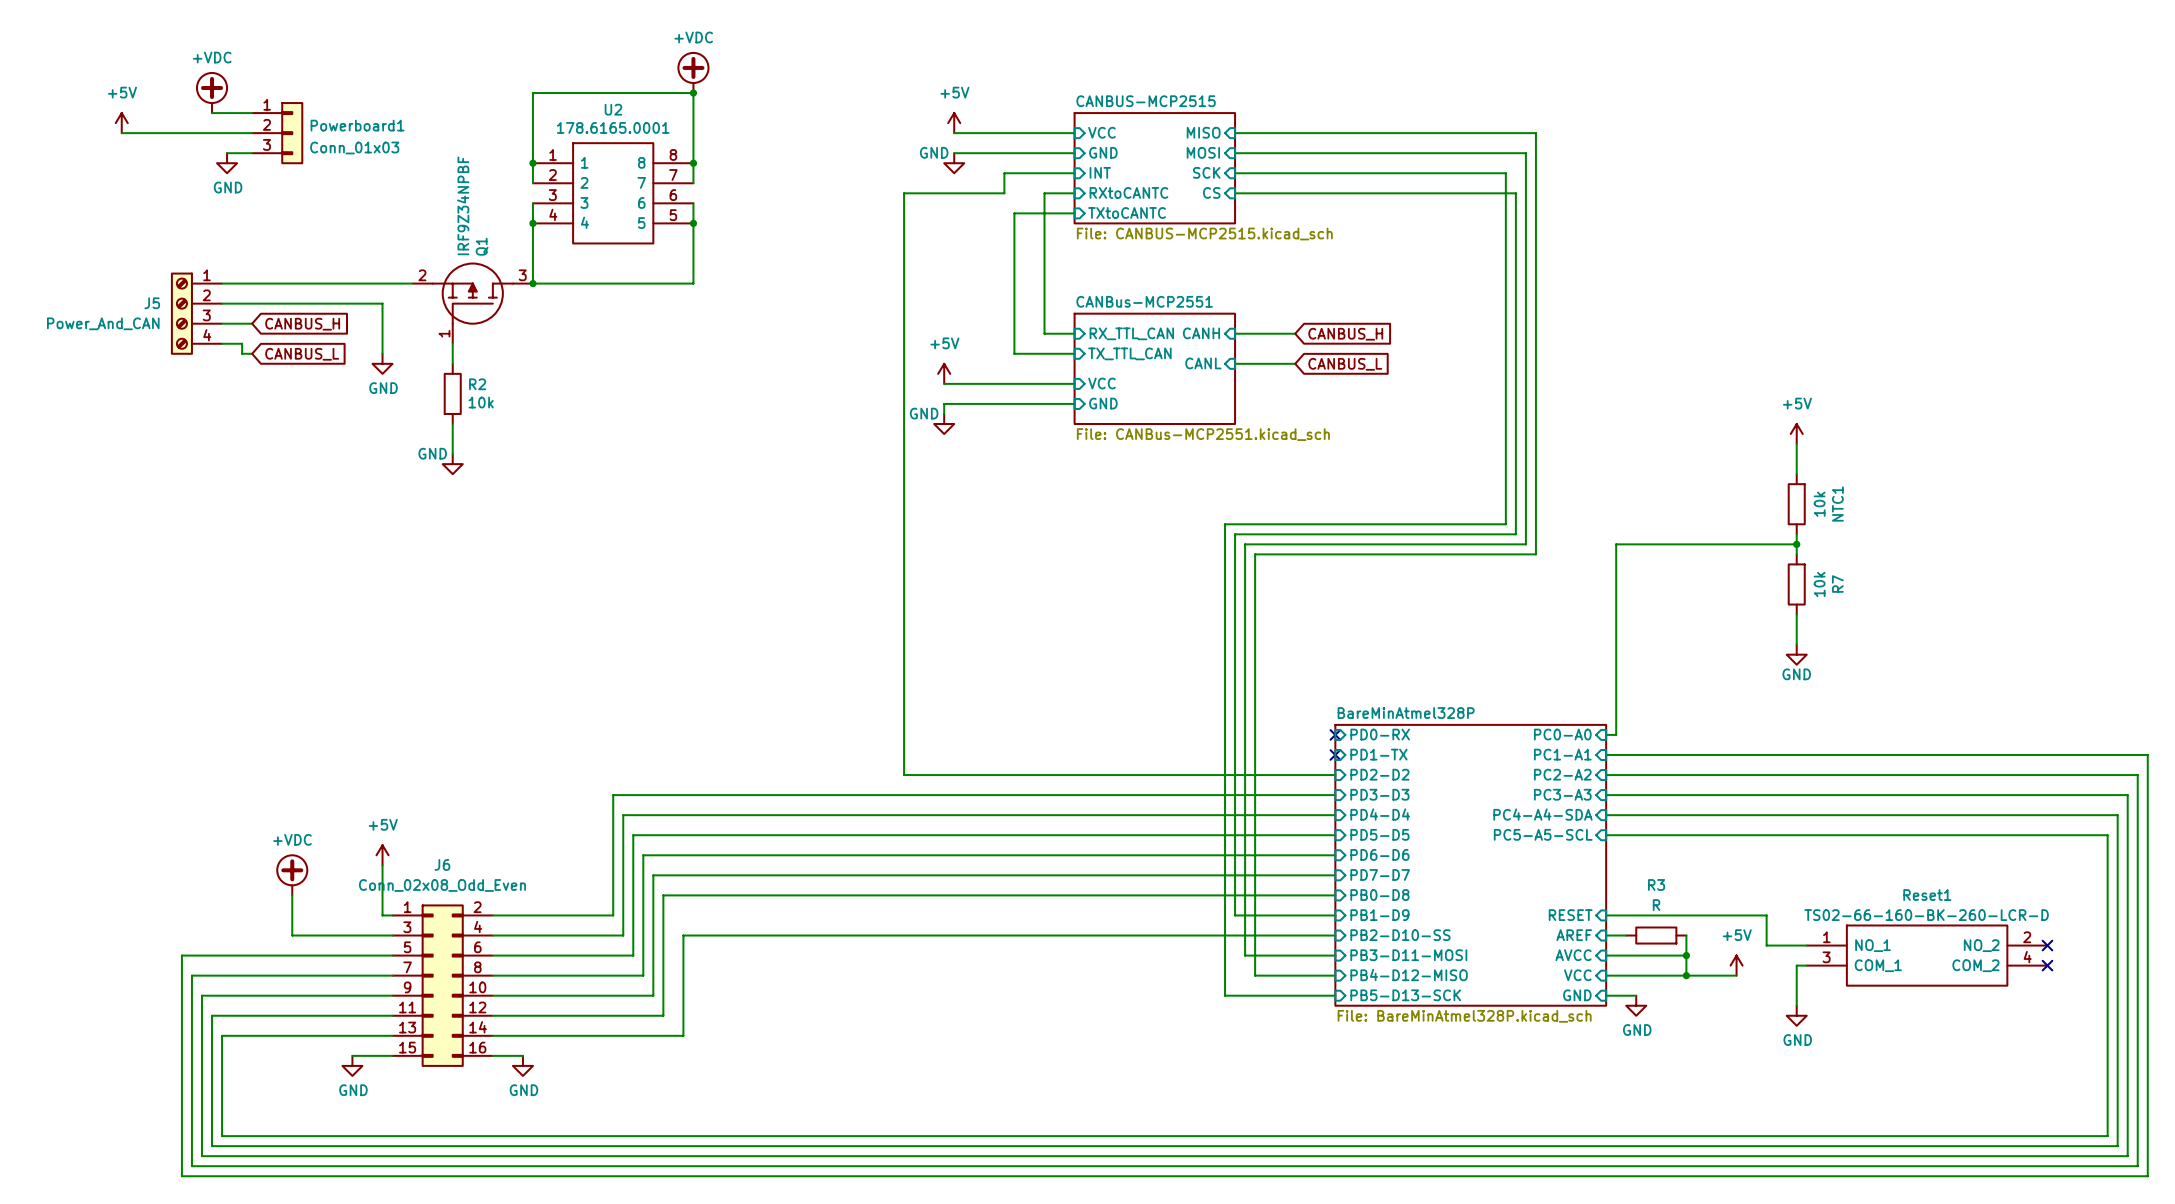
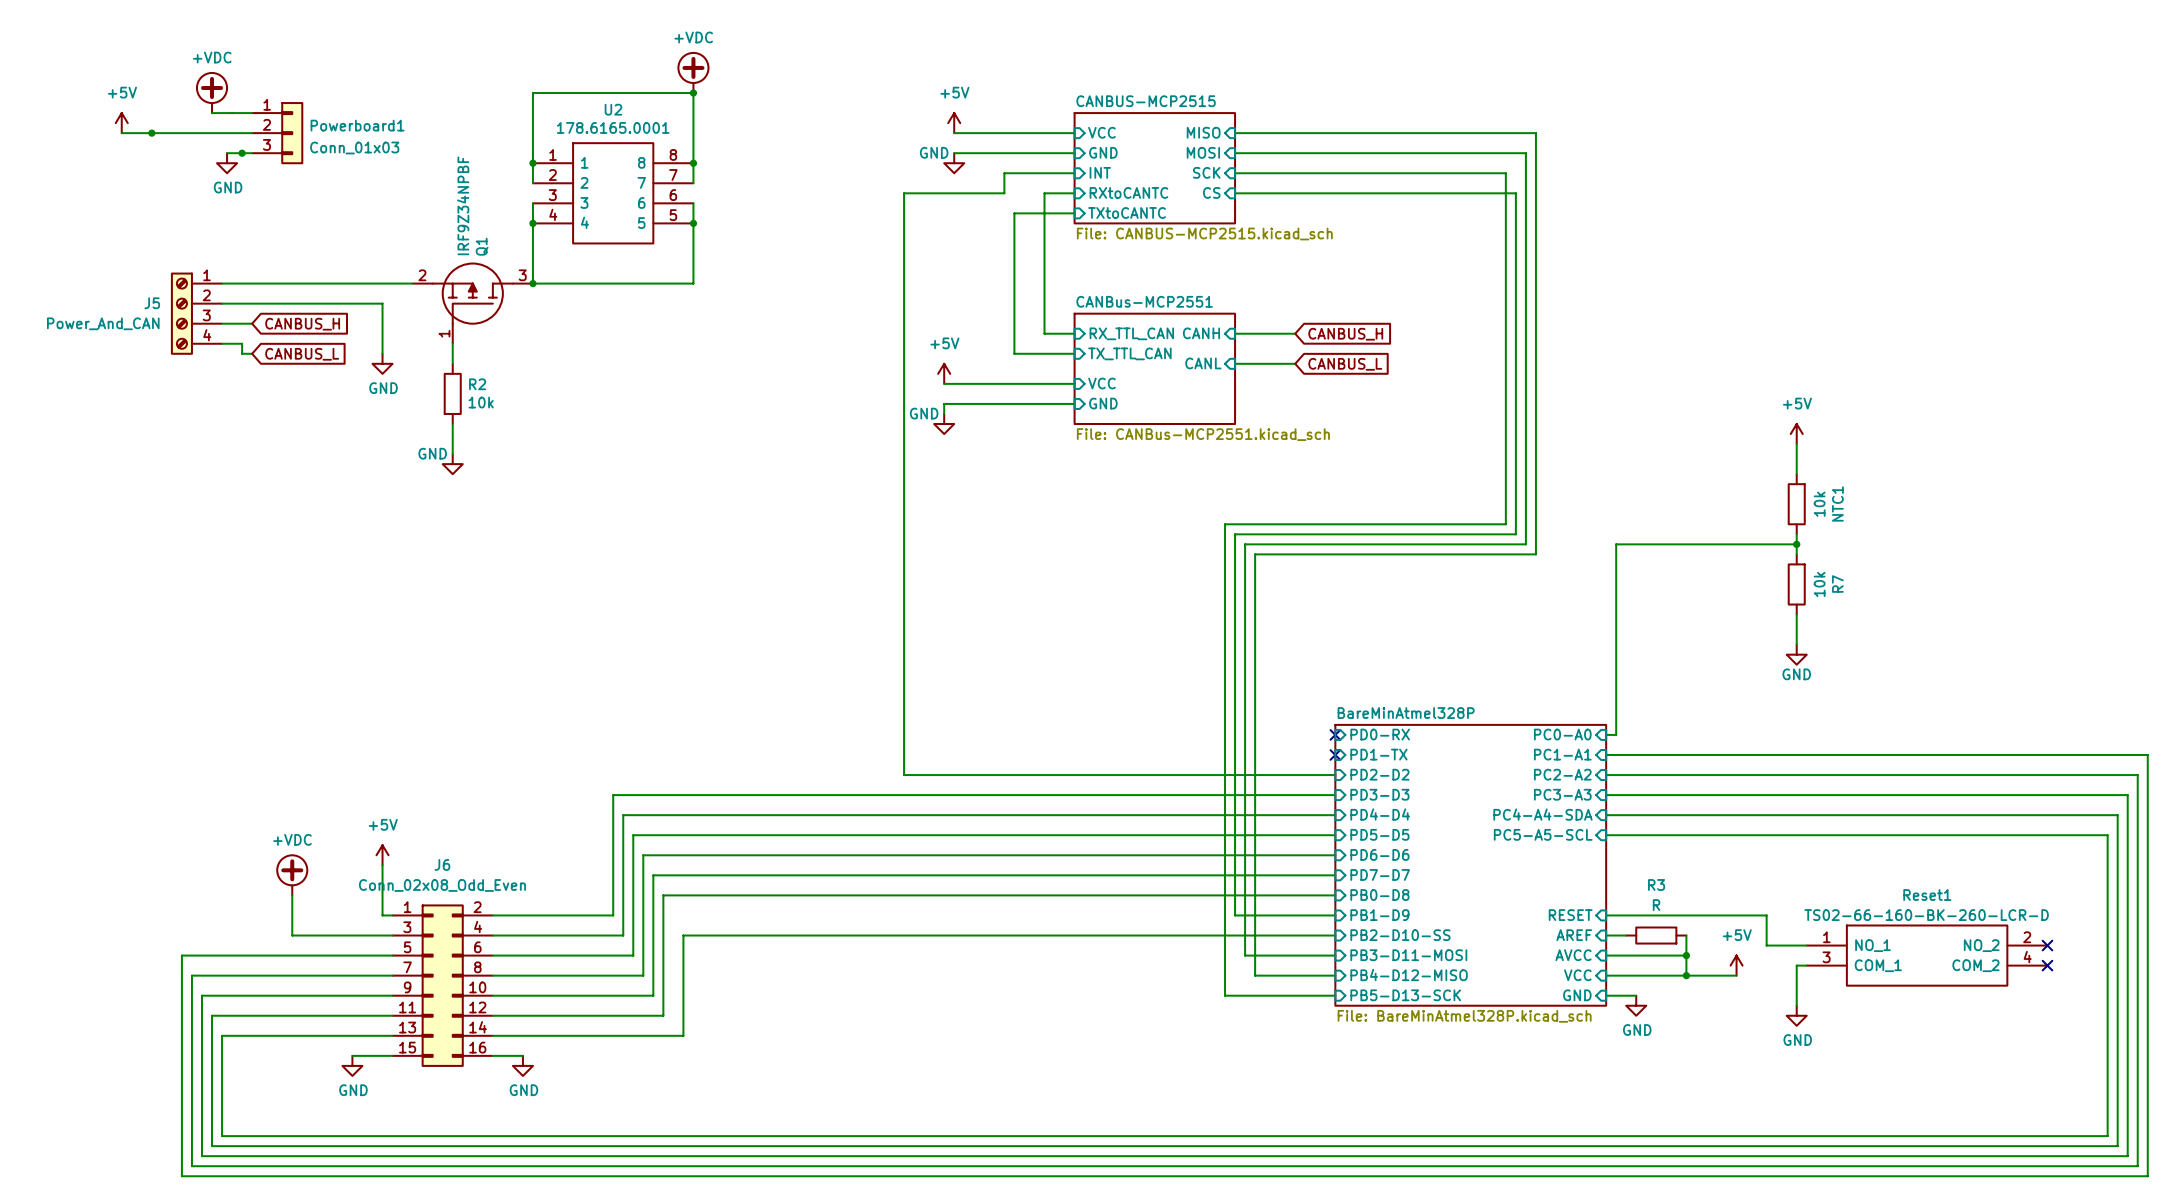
junction: none -> (151, 133)
junction: none -> (242, 153)

